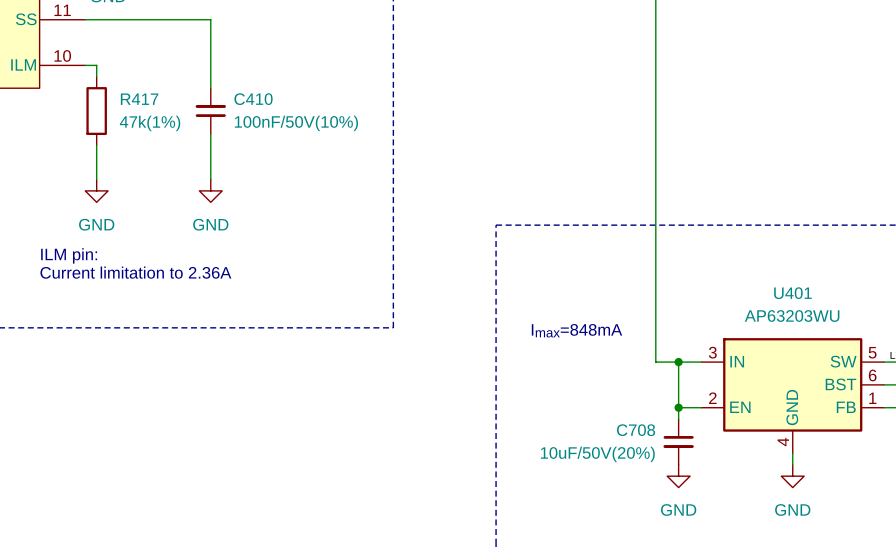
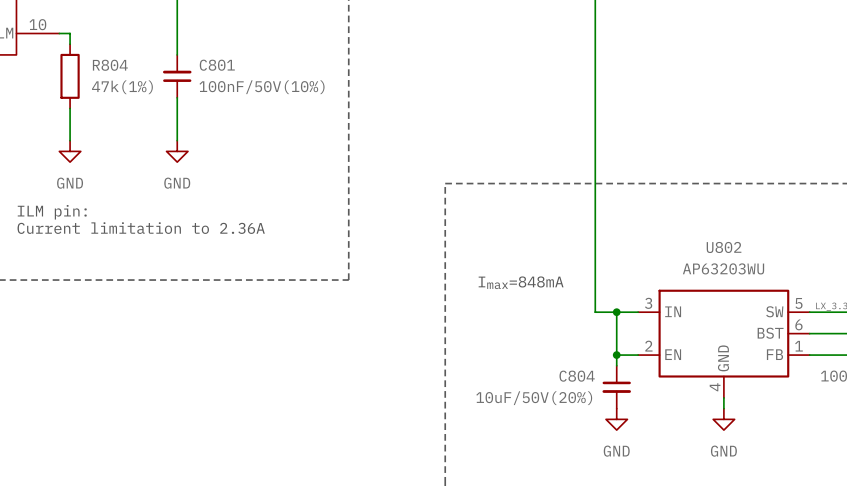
R417 name: R417 (139, 99) -> R804 (110, 65)
C410 name: C410 (253, 99) -> C801 (217, 65)
U401 name: U401 (792, 293) -> U802 (724, 247)
C708 name: C708 (636, 430) -> C804 (577, 376)

